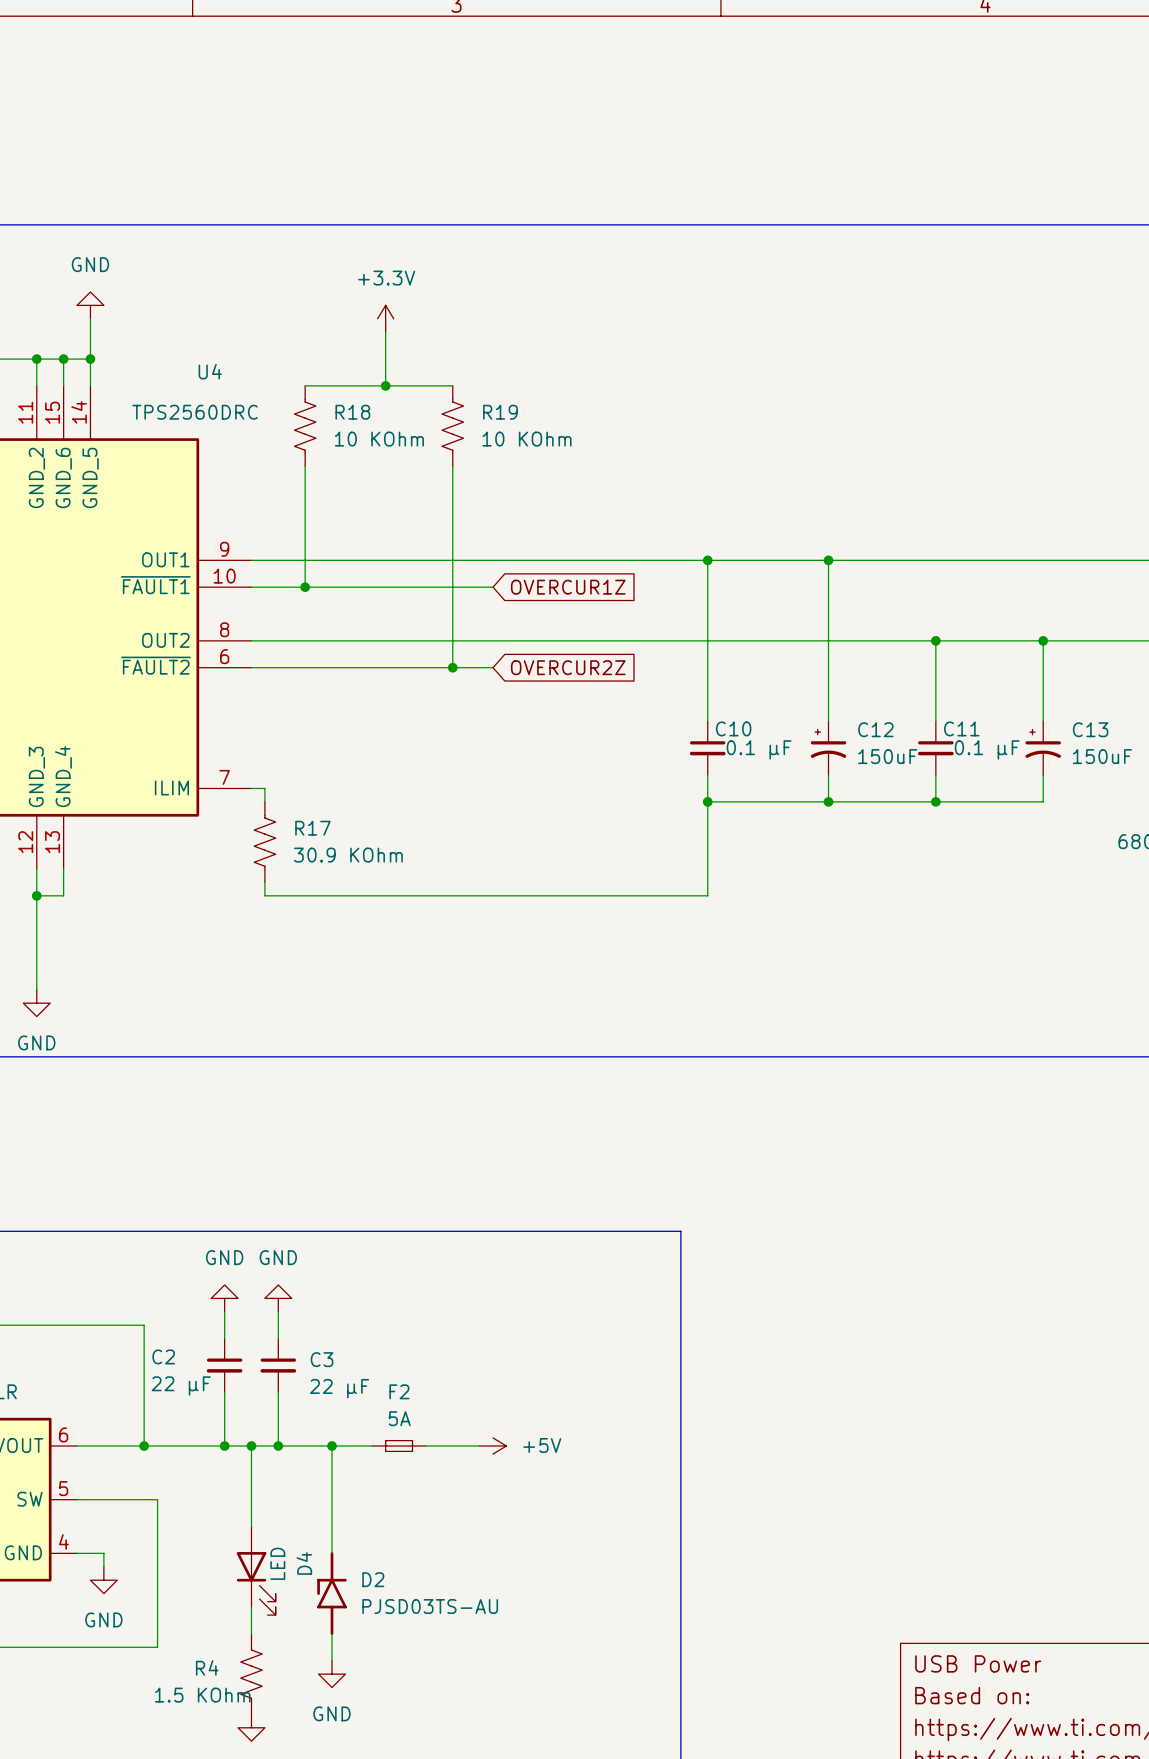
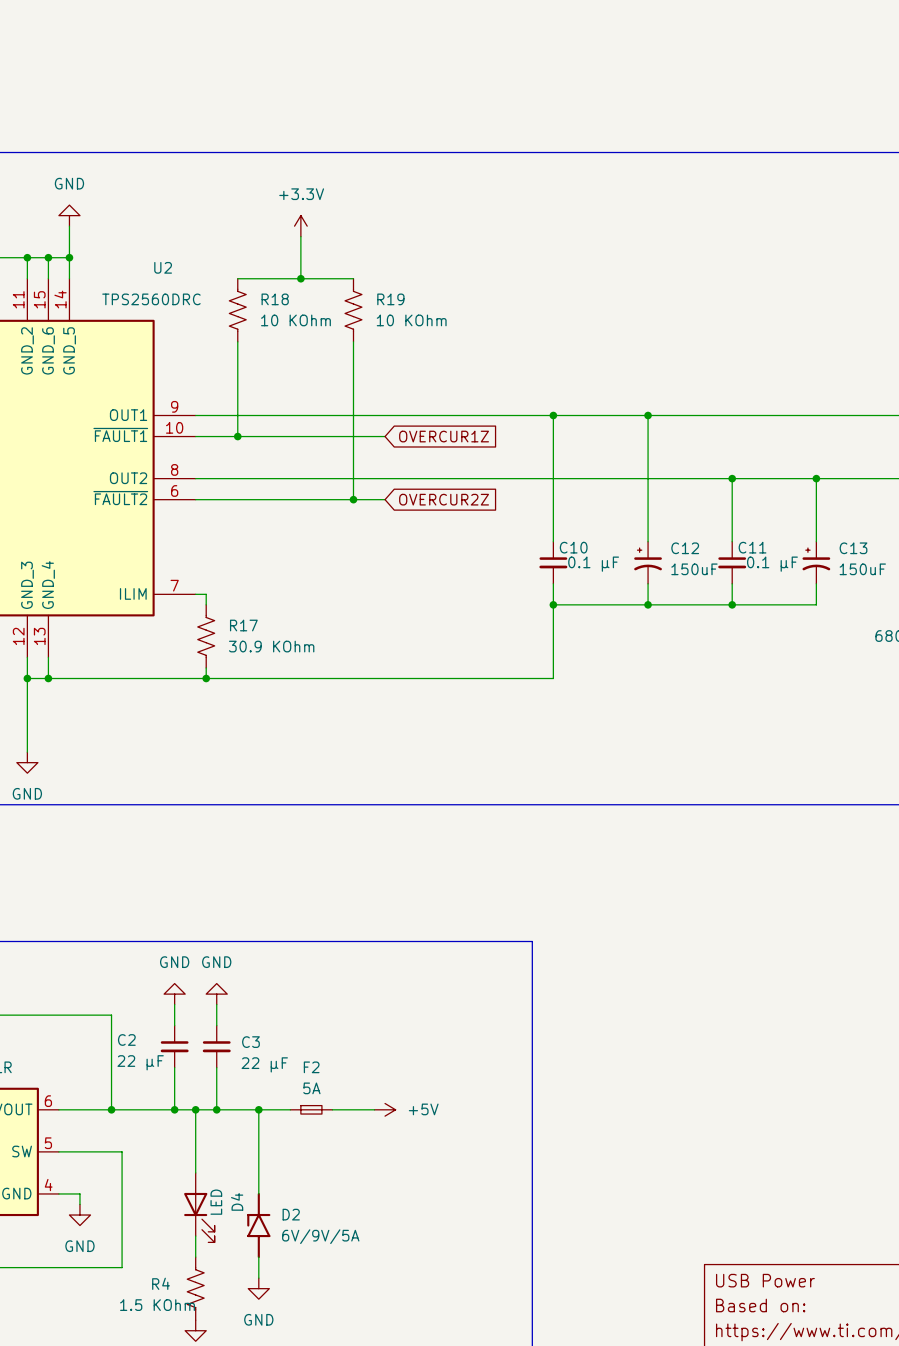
U4 name: U4 (210, 371) -> U2 (163, 267)
wire: none -> (48, 678) (206, 678)
junction: none -> (48, 678)
junction: none -> (206, 678)
D2 value: PJSD03TS-AU (430, 1606) -> 6V/9V/5A (320, 1236)

